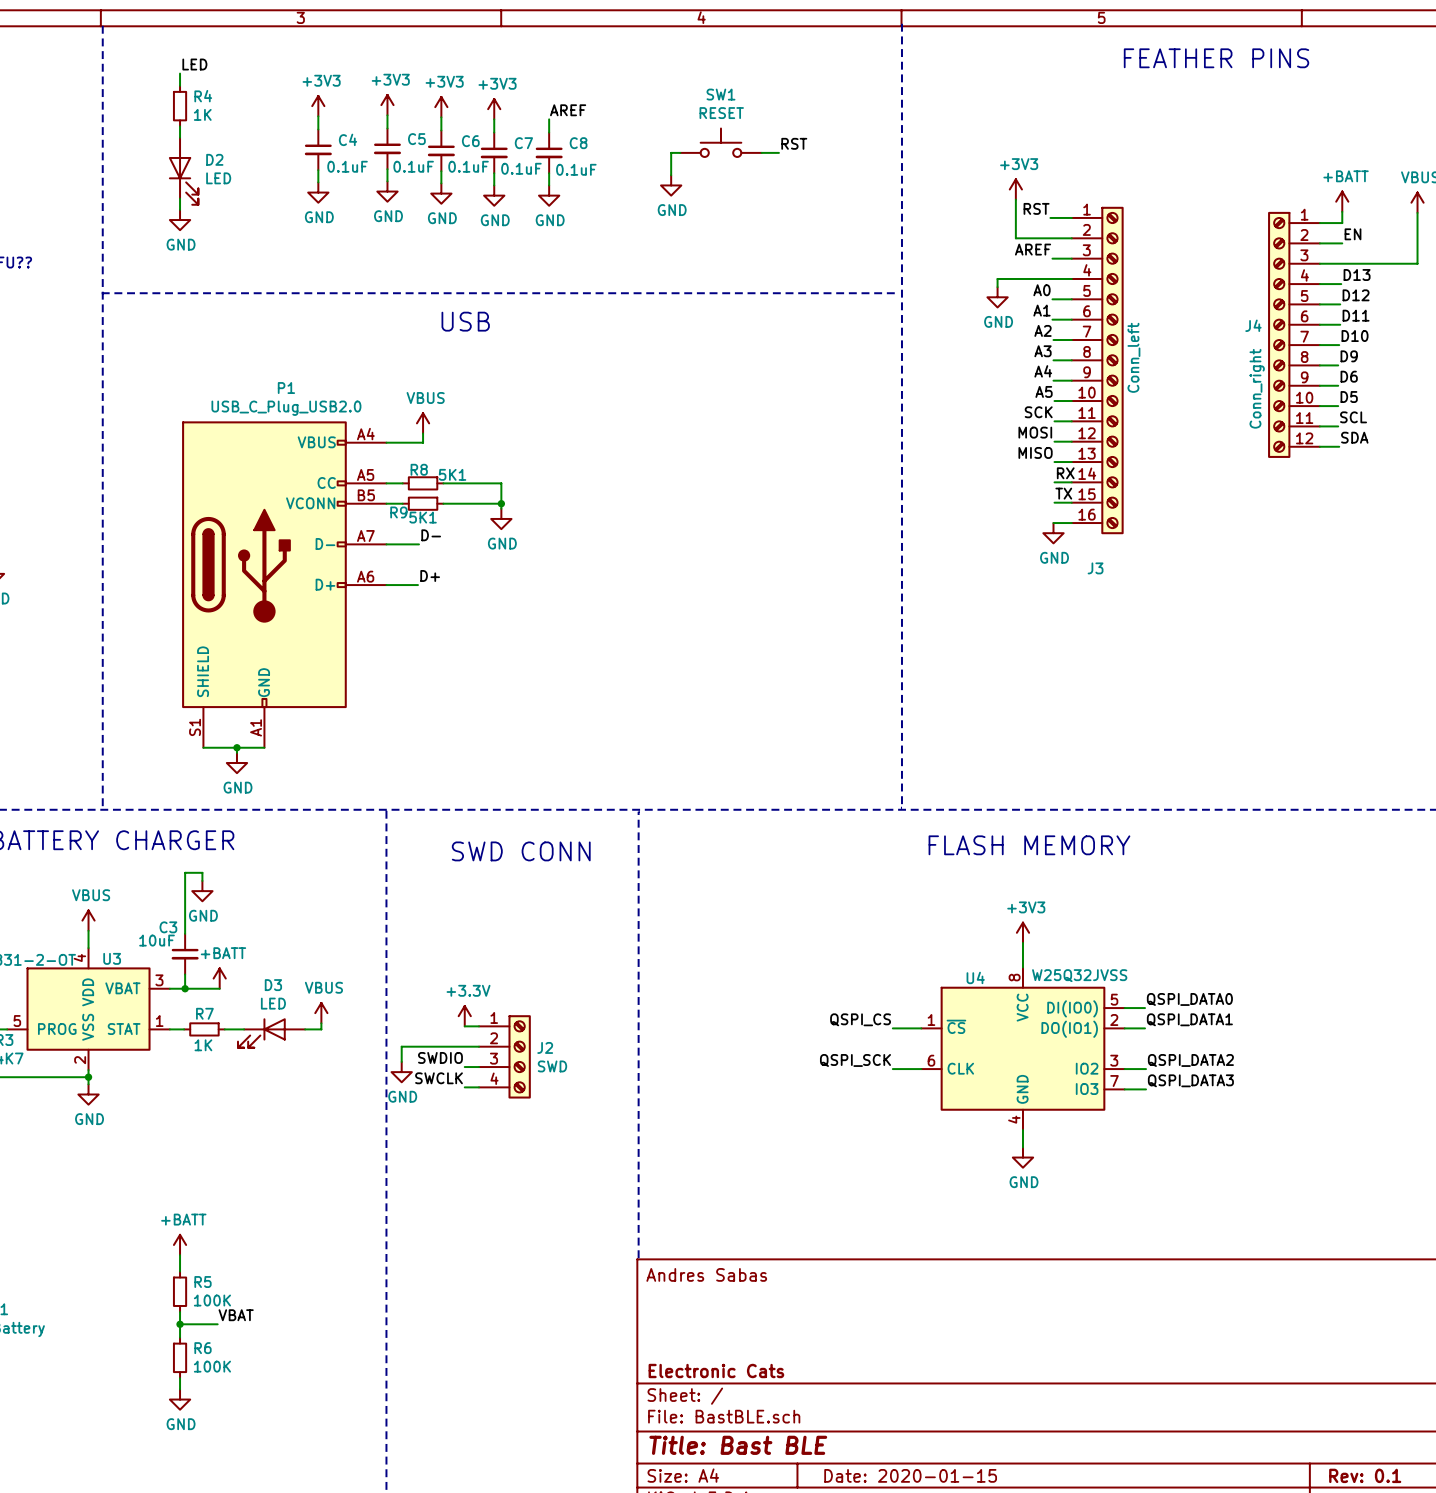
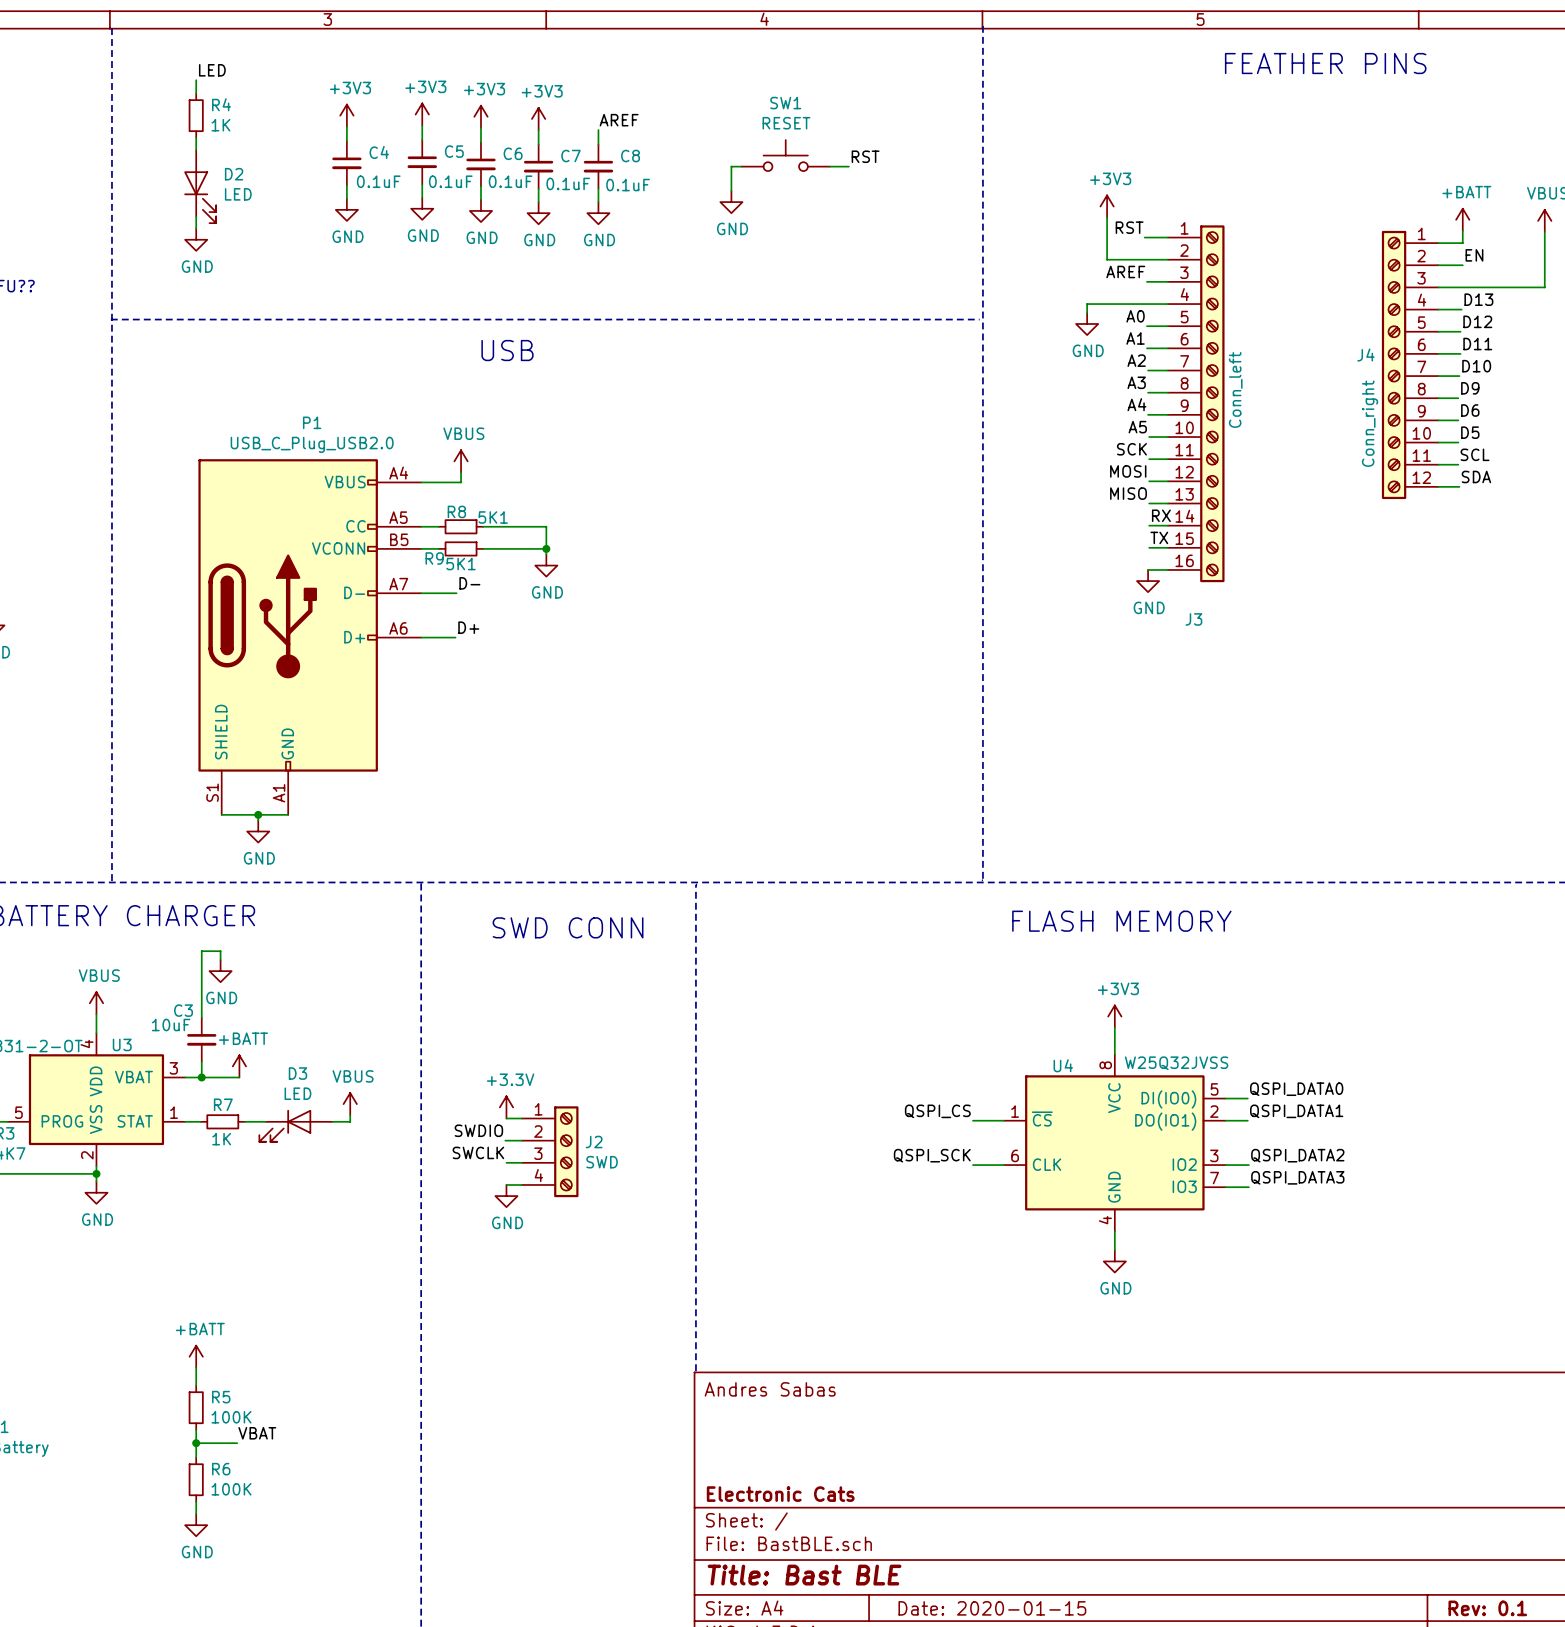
label: none -> SWDIO (478, 1130)
wire: (463, 1046) (401, 1046) (401, 1061) -> none
label: SWDIO (440, 1057) -> SWCLK (478, 1152)
power symbol position: GND (401, 1072) -> GND (506, 1196)
label: SWCLK (439, 1078) -> none

